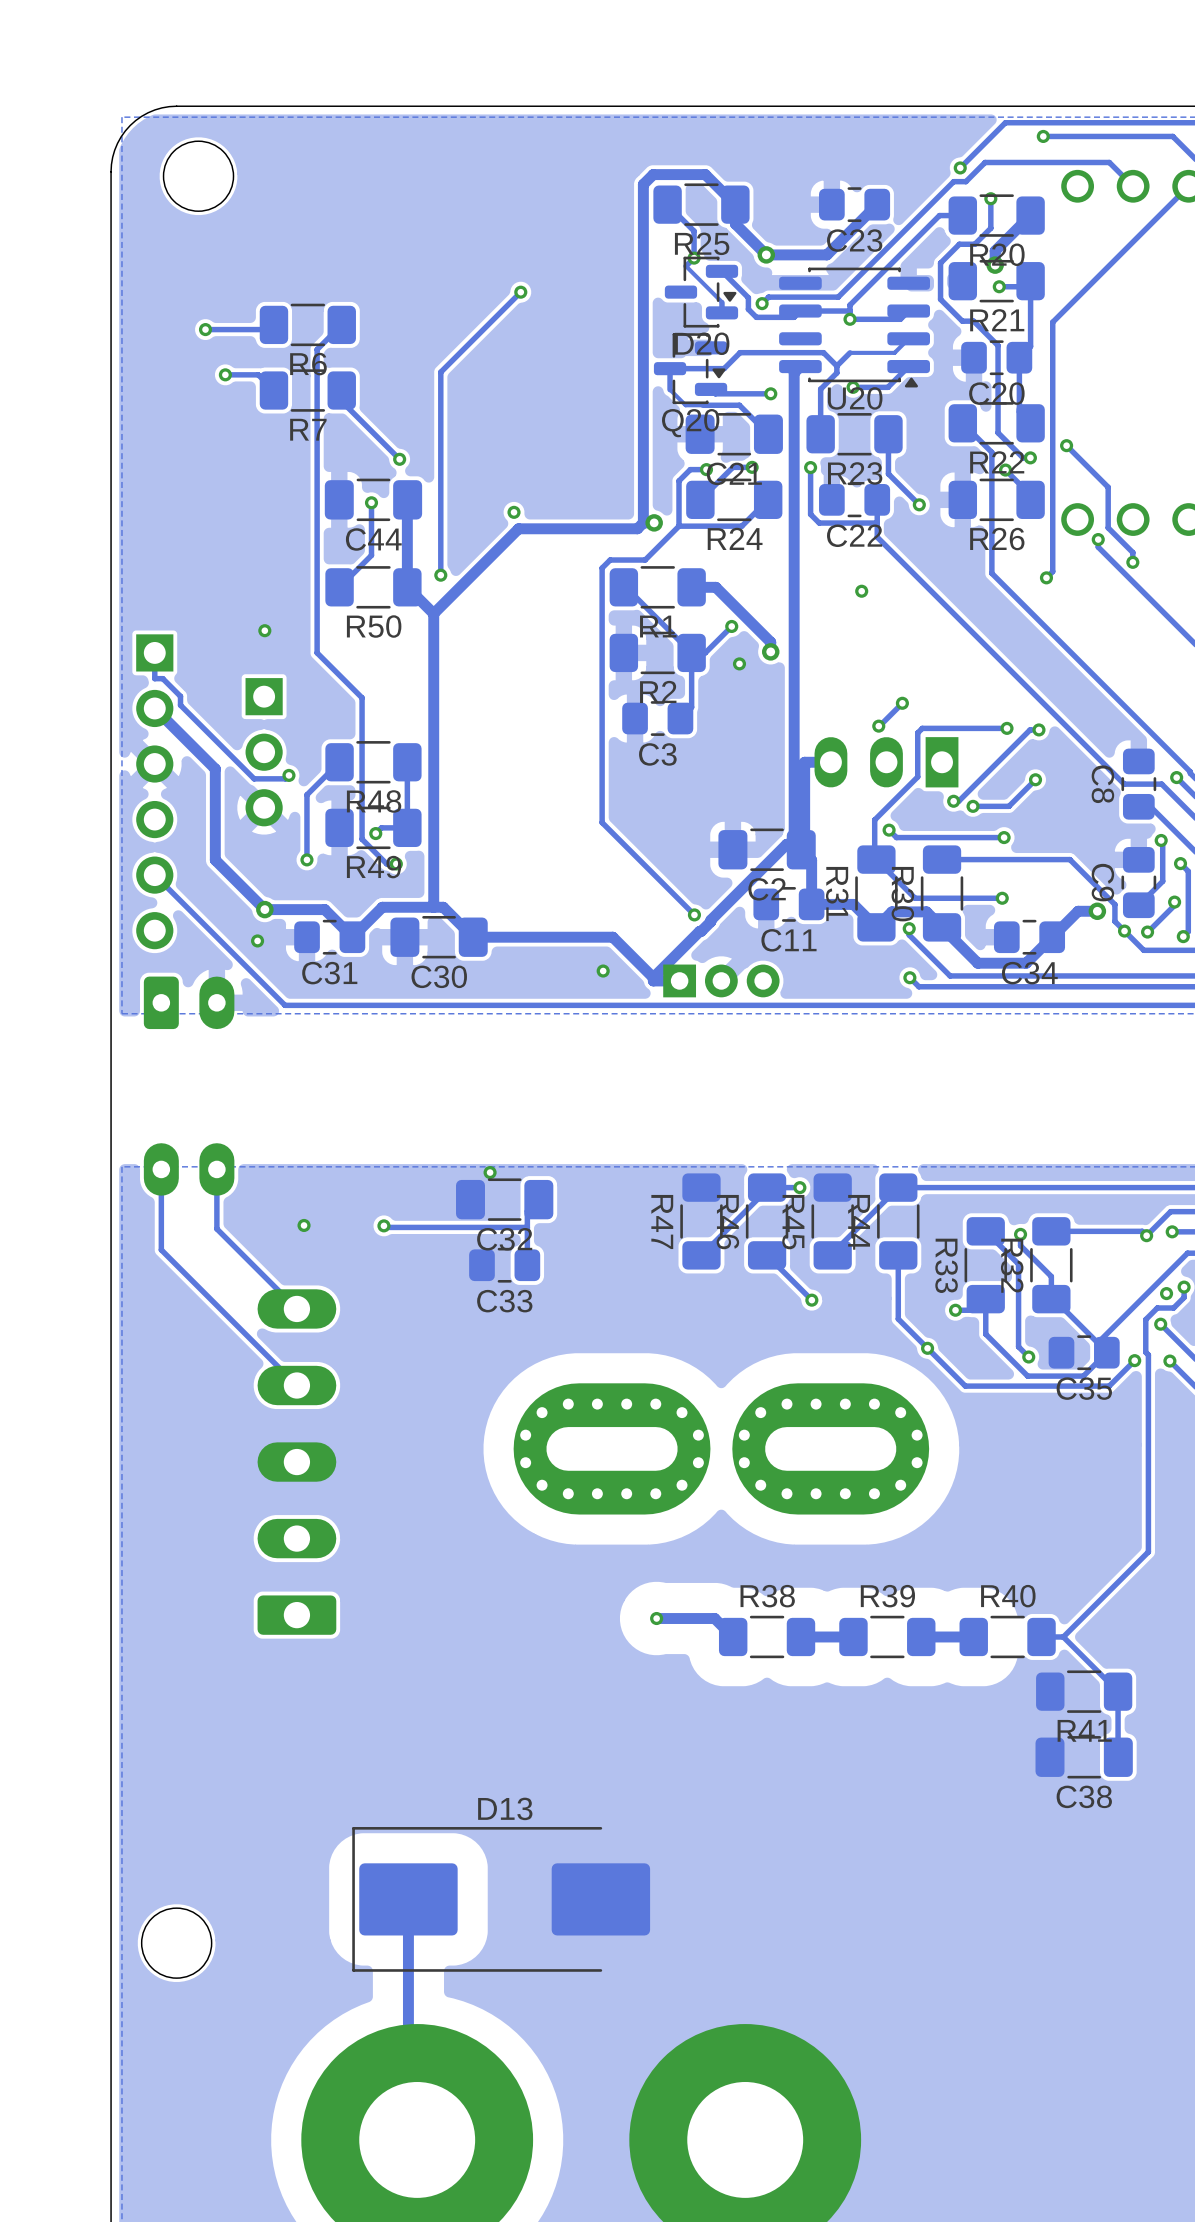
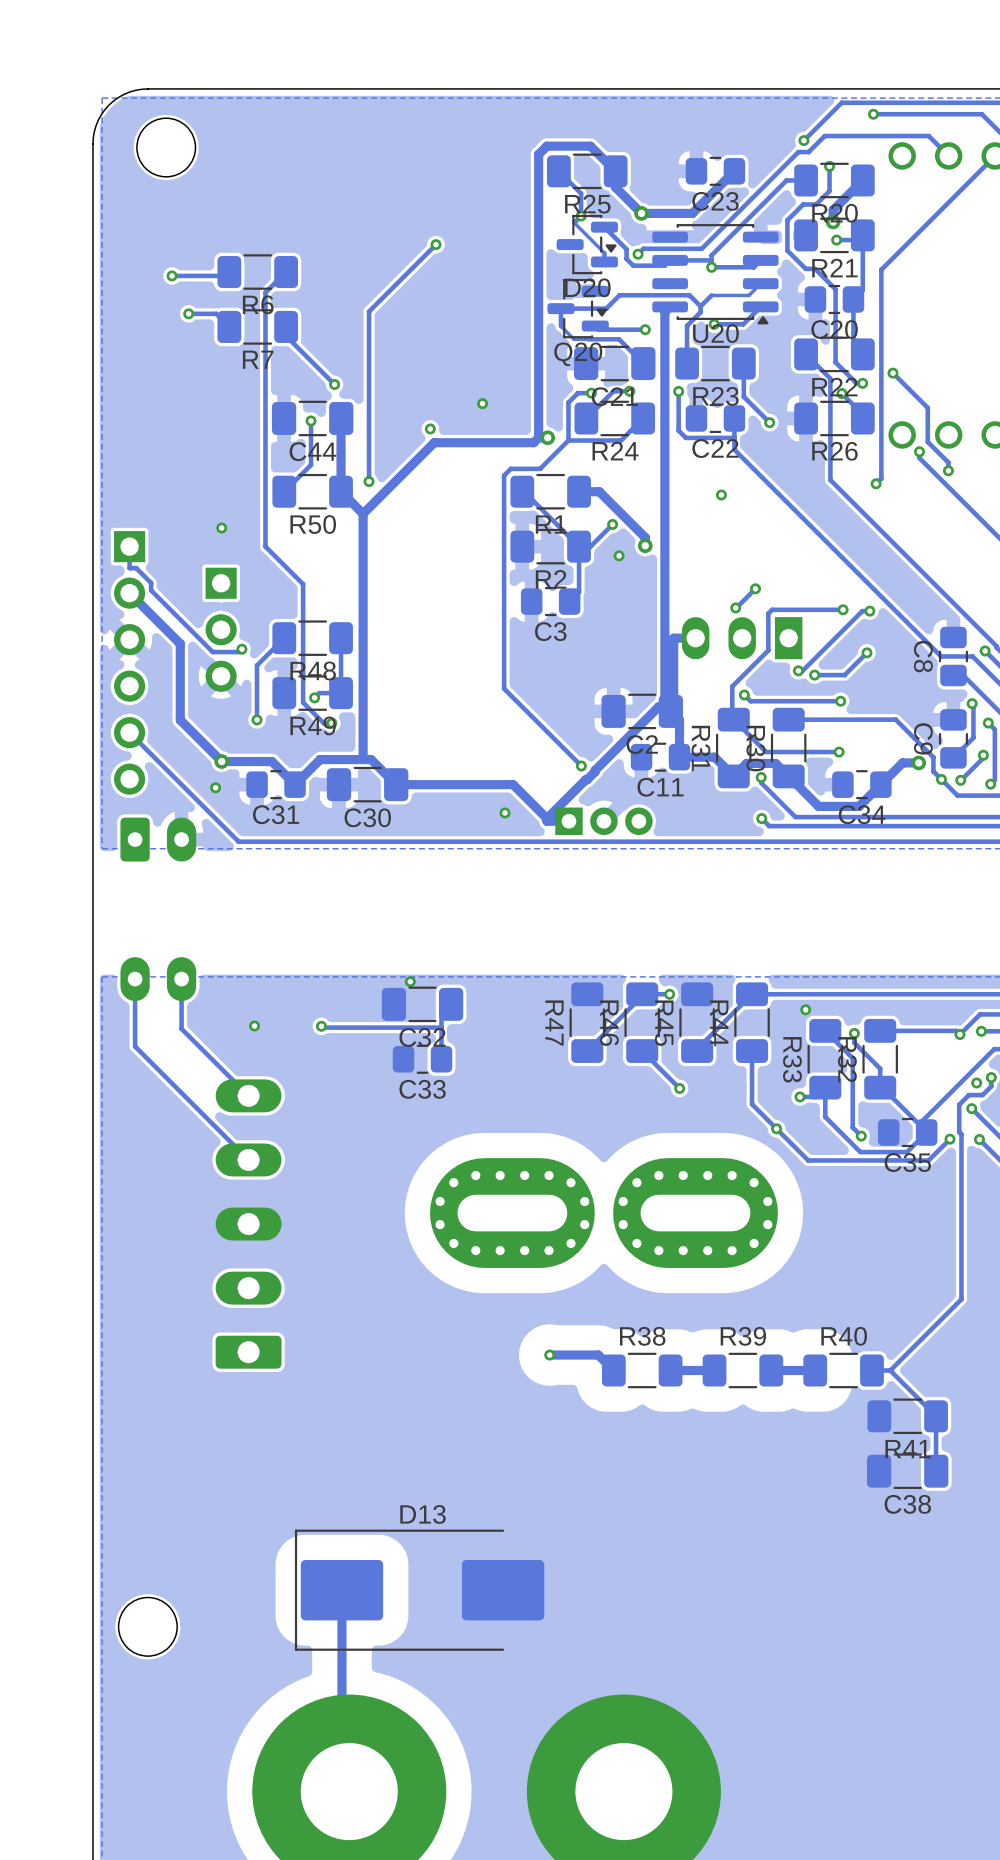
via: none -> (482, 403)
via: none -> (805, 1009)

